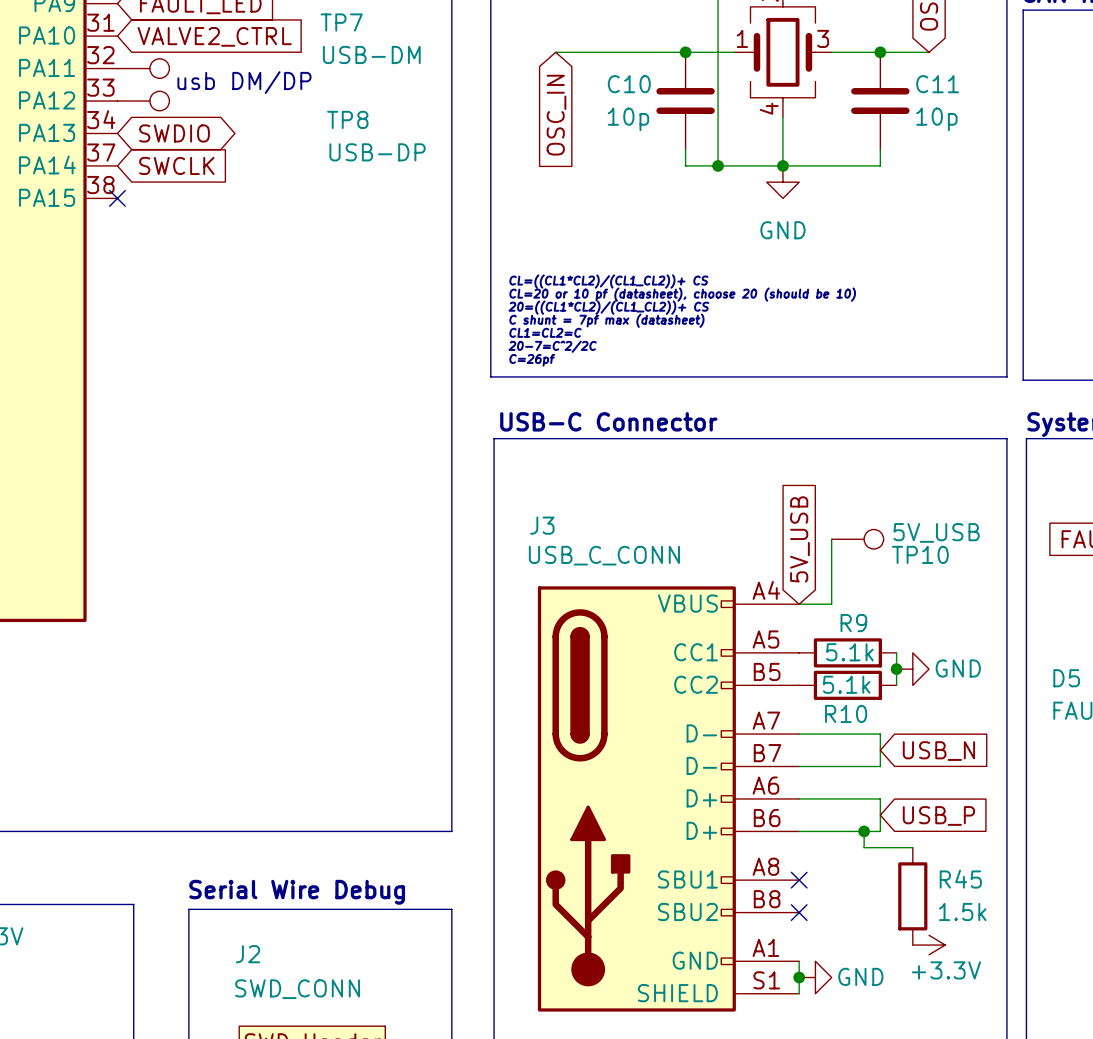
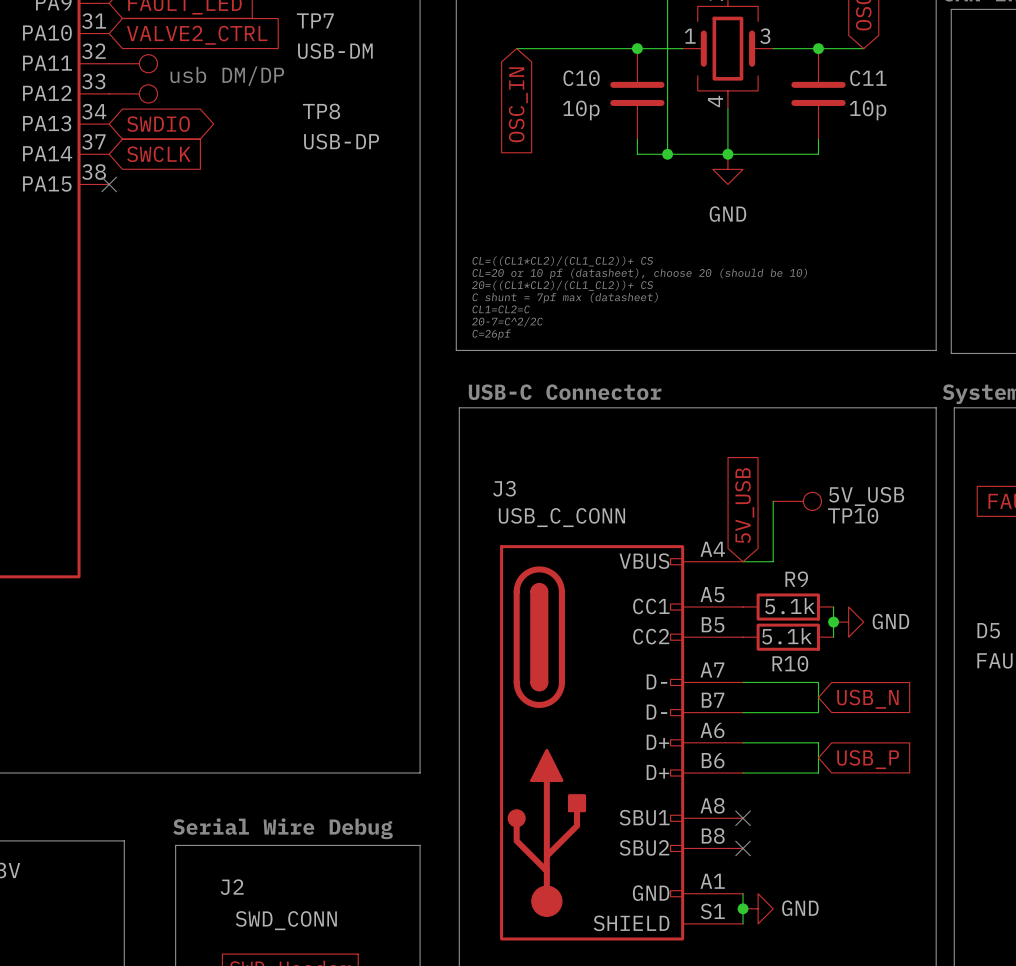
wire: (864, 831) (864, 847) (912, 847) -> none
junction: (864, 831) -> none
R45: 1.5k (912, 896) -> none
power symbol: +3.3V (929, 945) -> none

